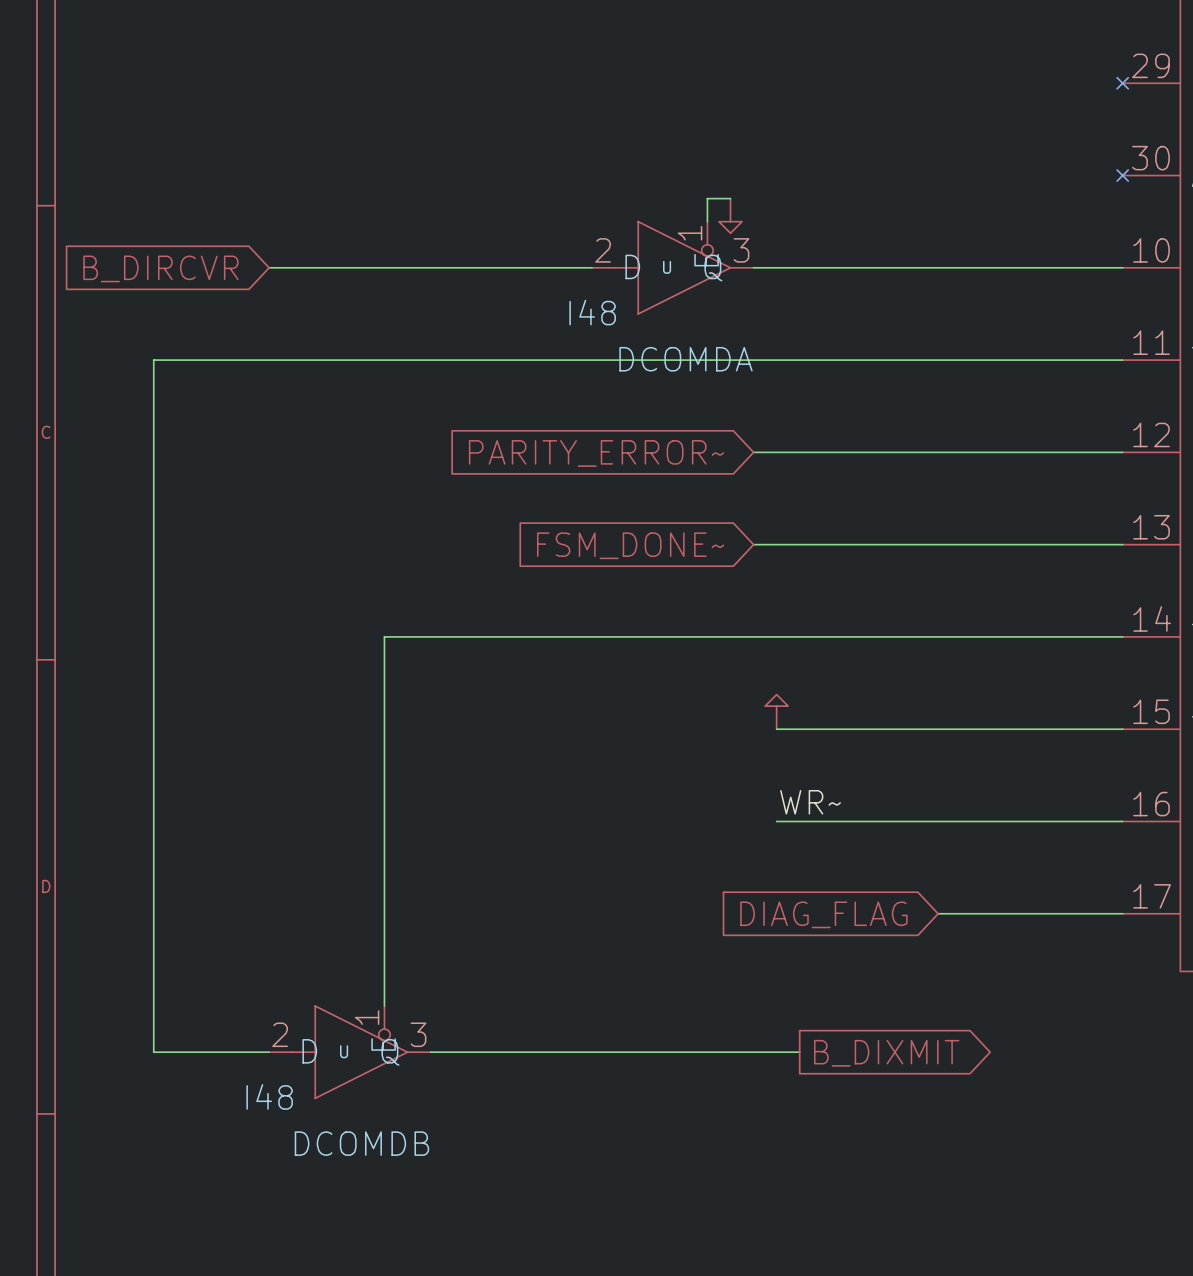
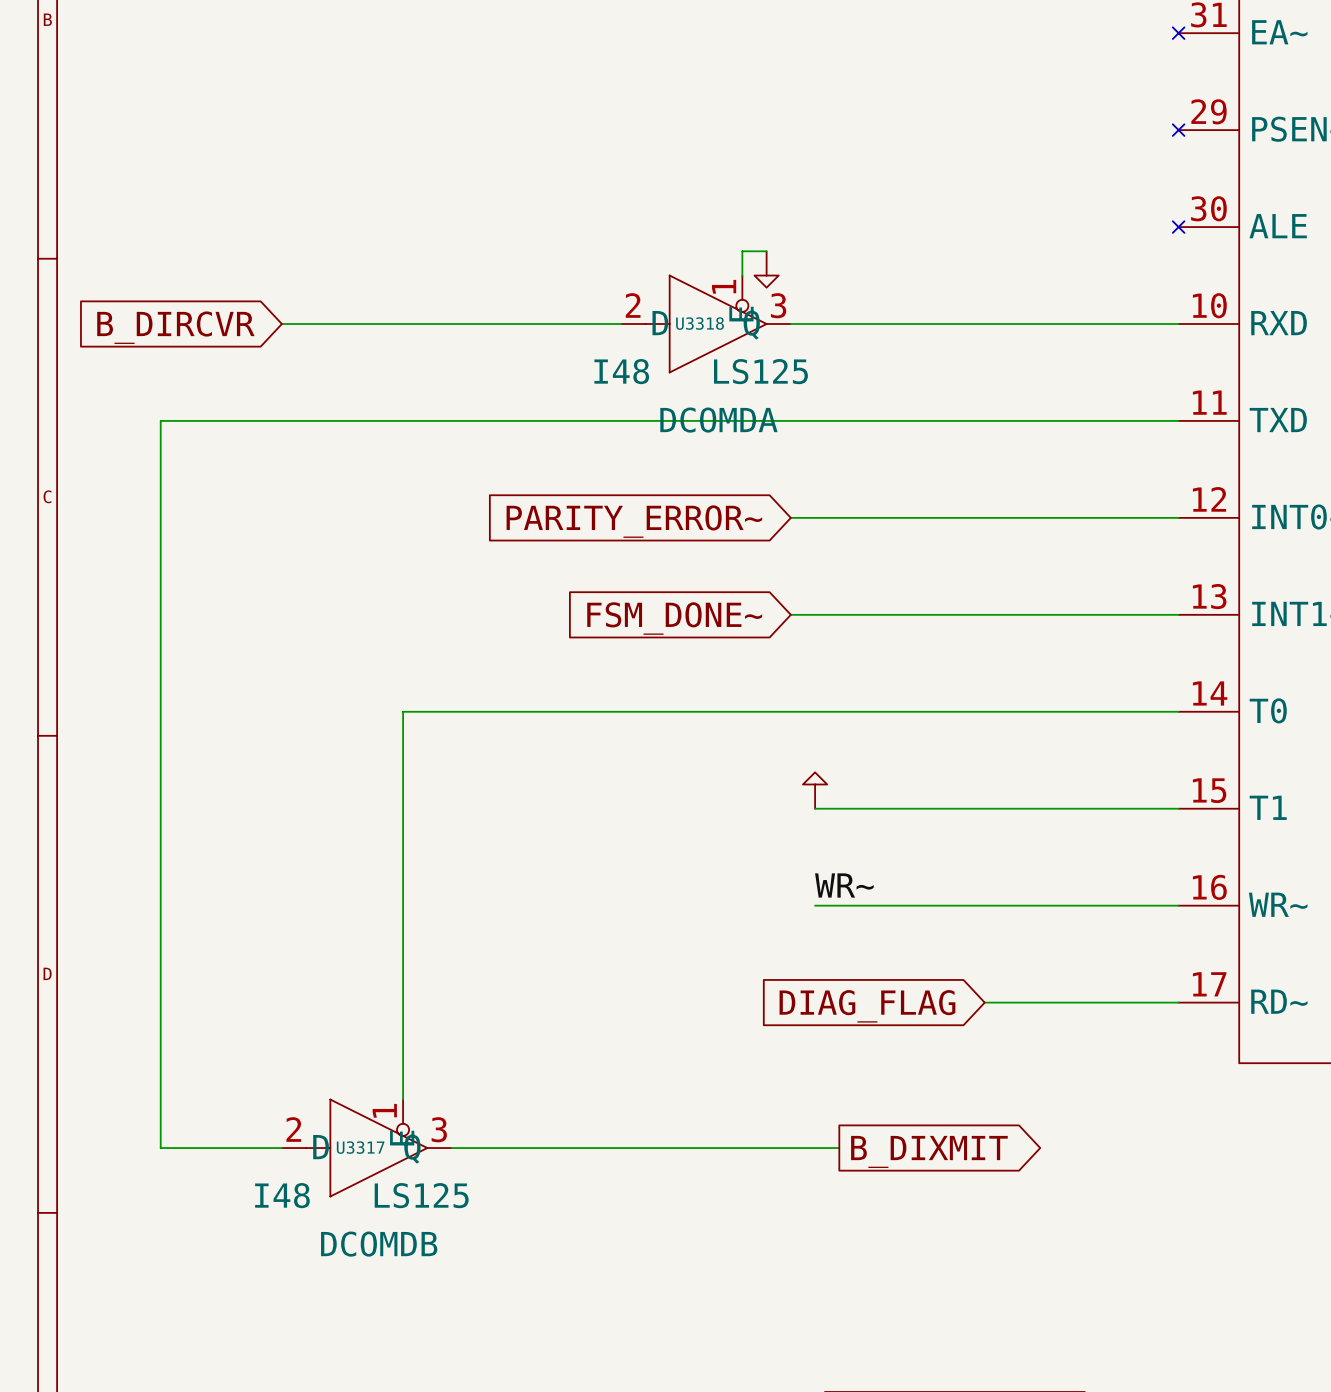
U name: U (667, 267) -> U3318 (700, 323)
U value: none -> LS125 (760, 371)
U name: U (344, 1051) -> U3317 (360, 1147)
U value: none -> LS125 (421, 1195)

